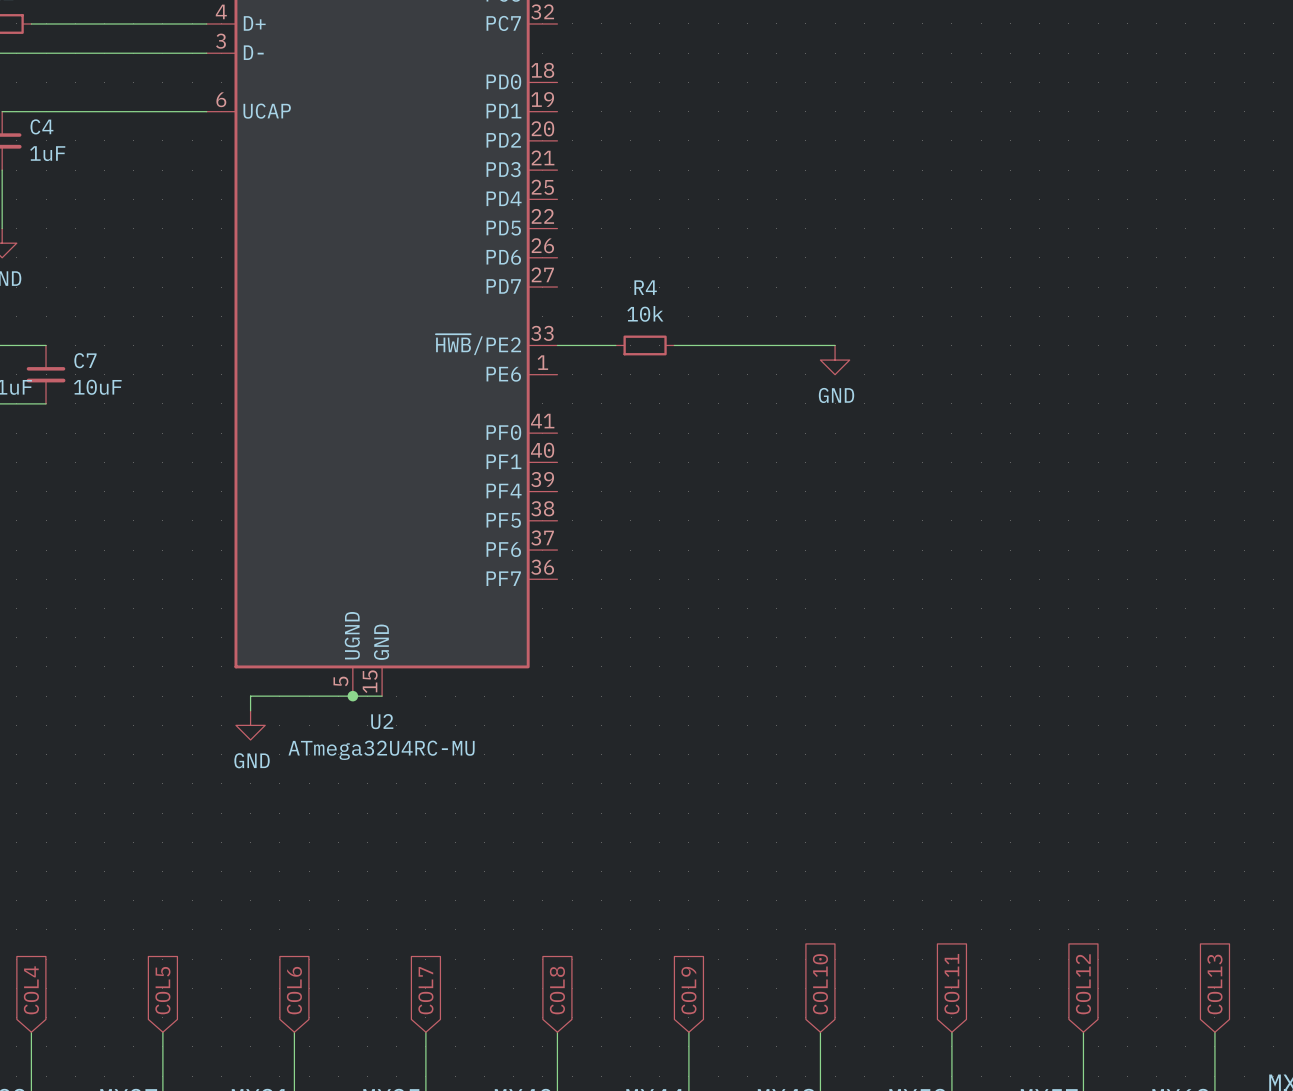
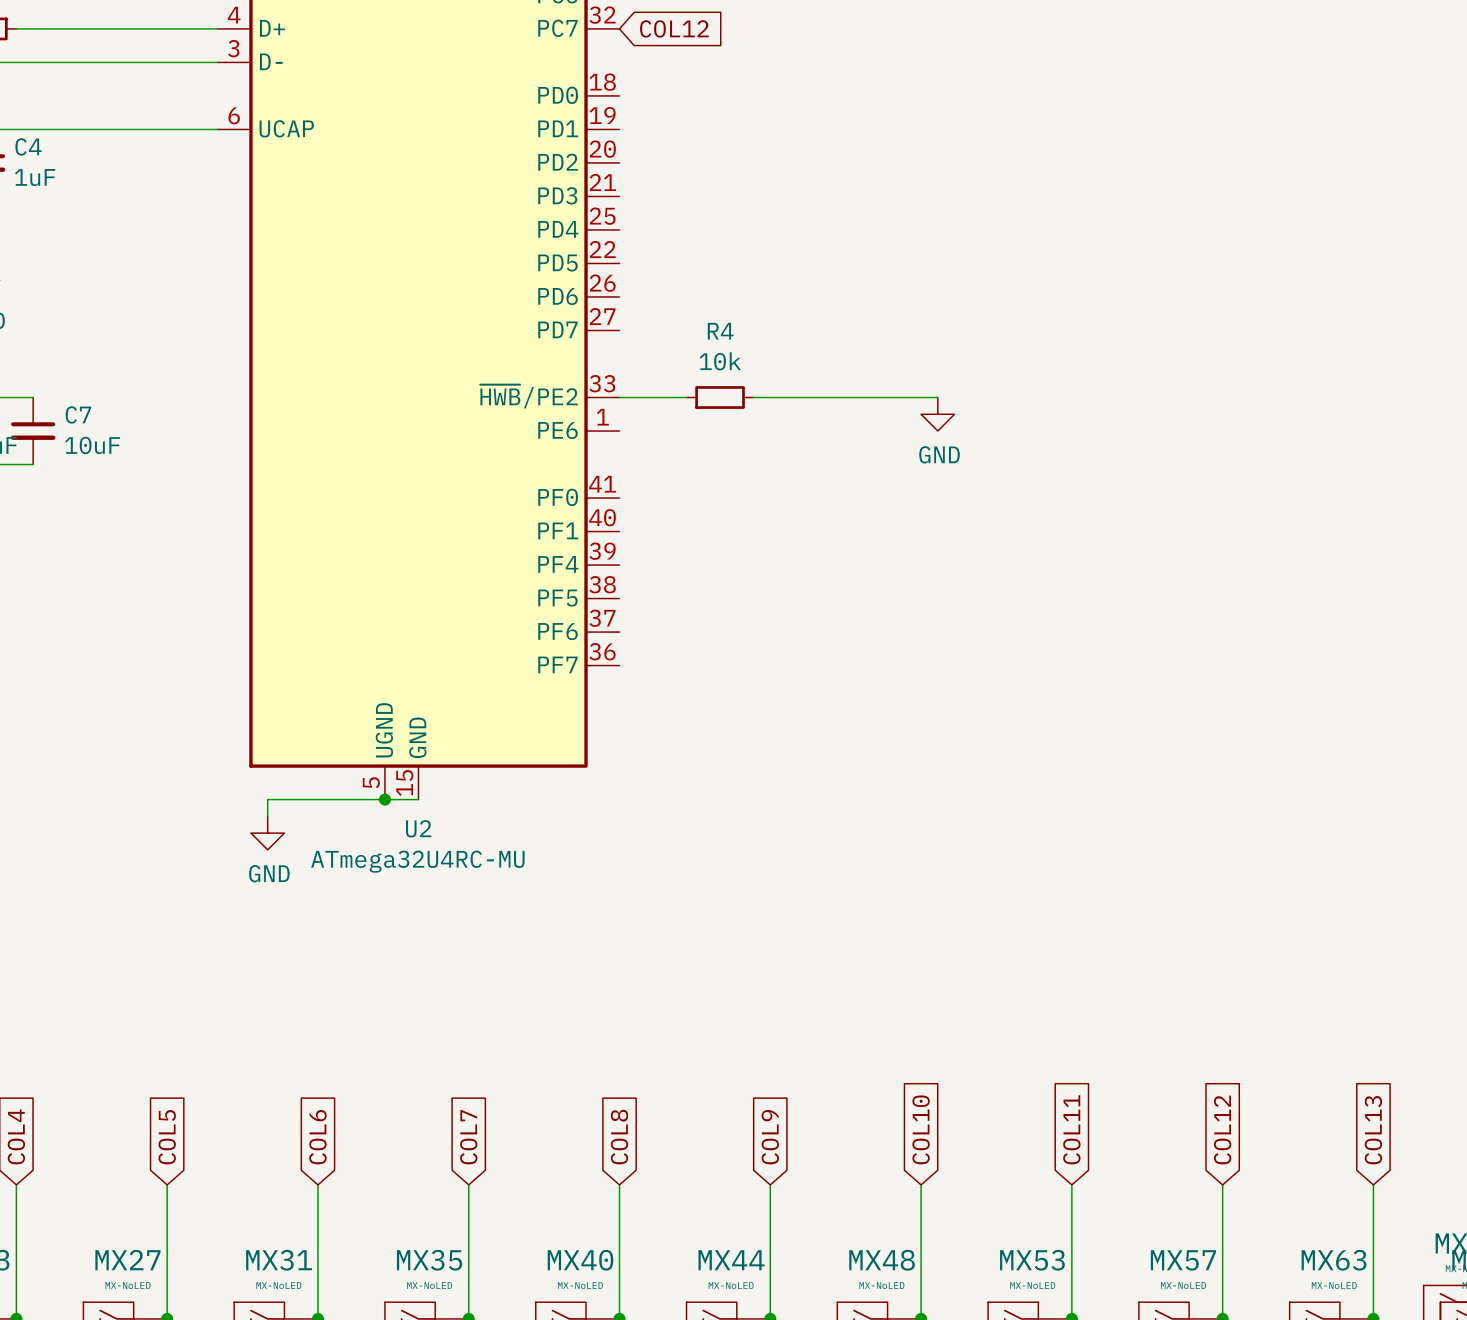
global label: none -> COL12 (674, 28)

